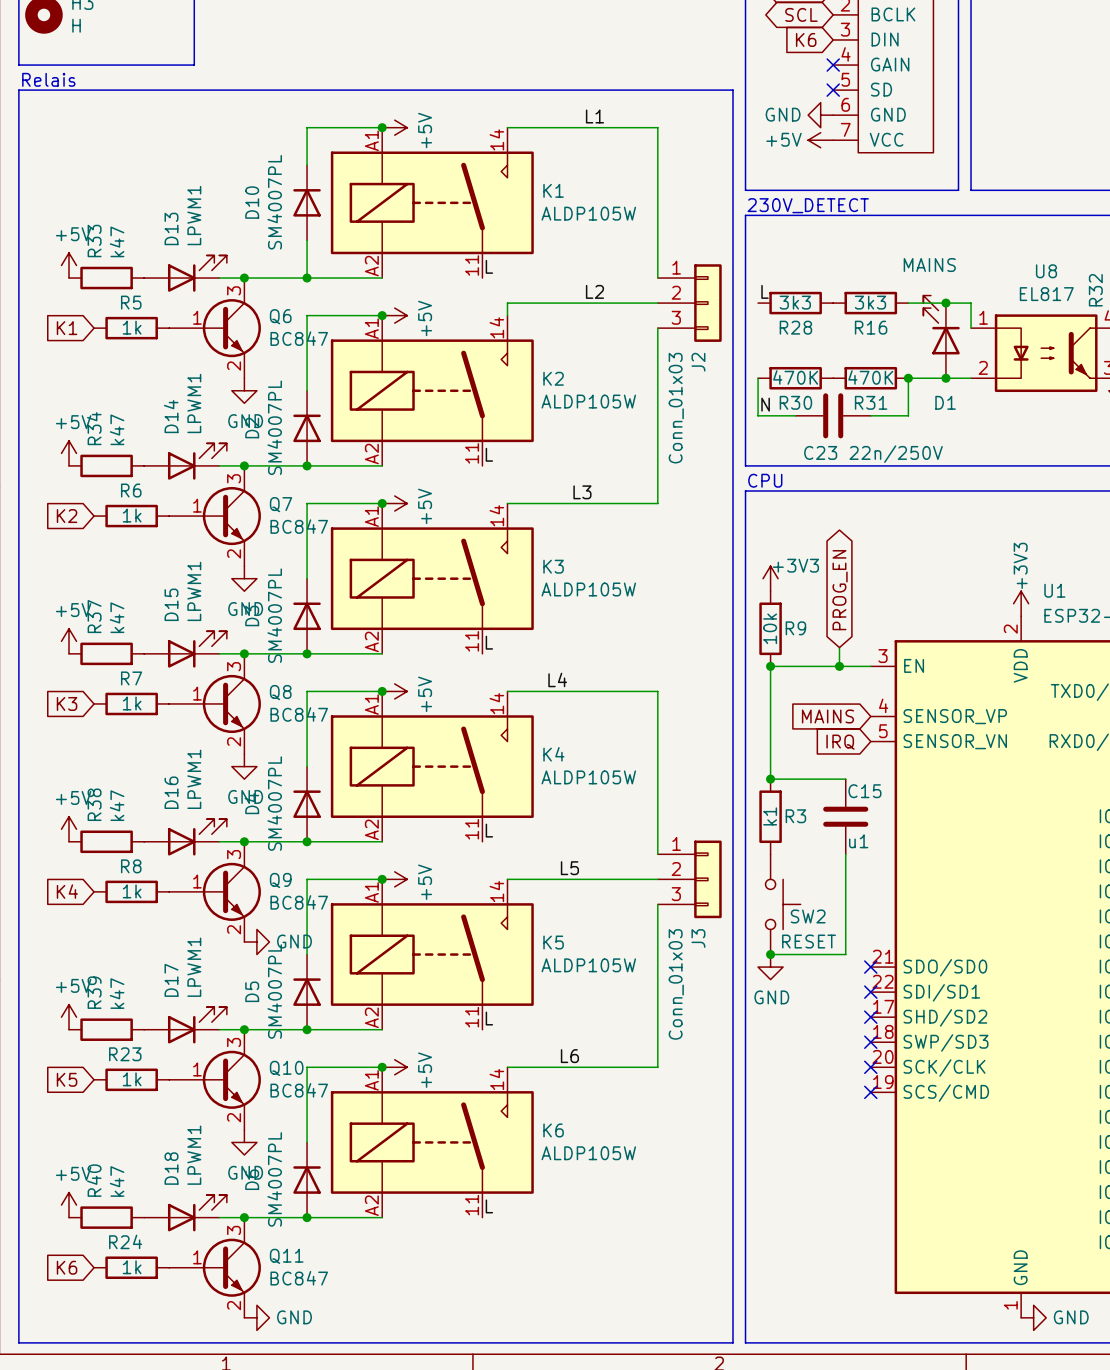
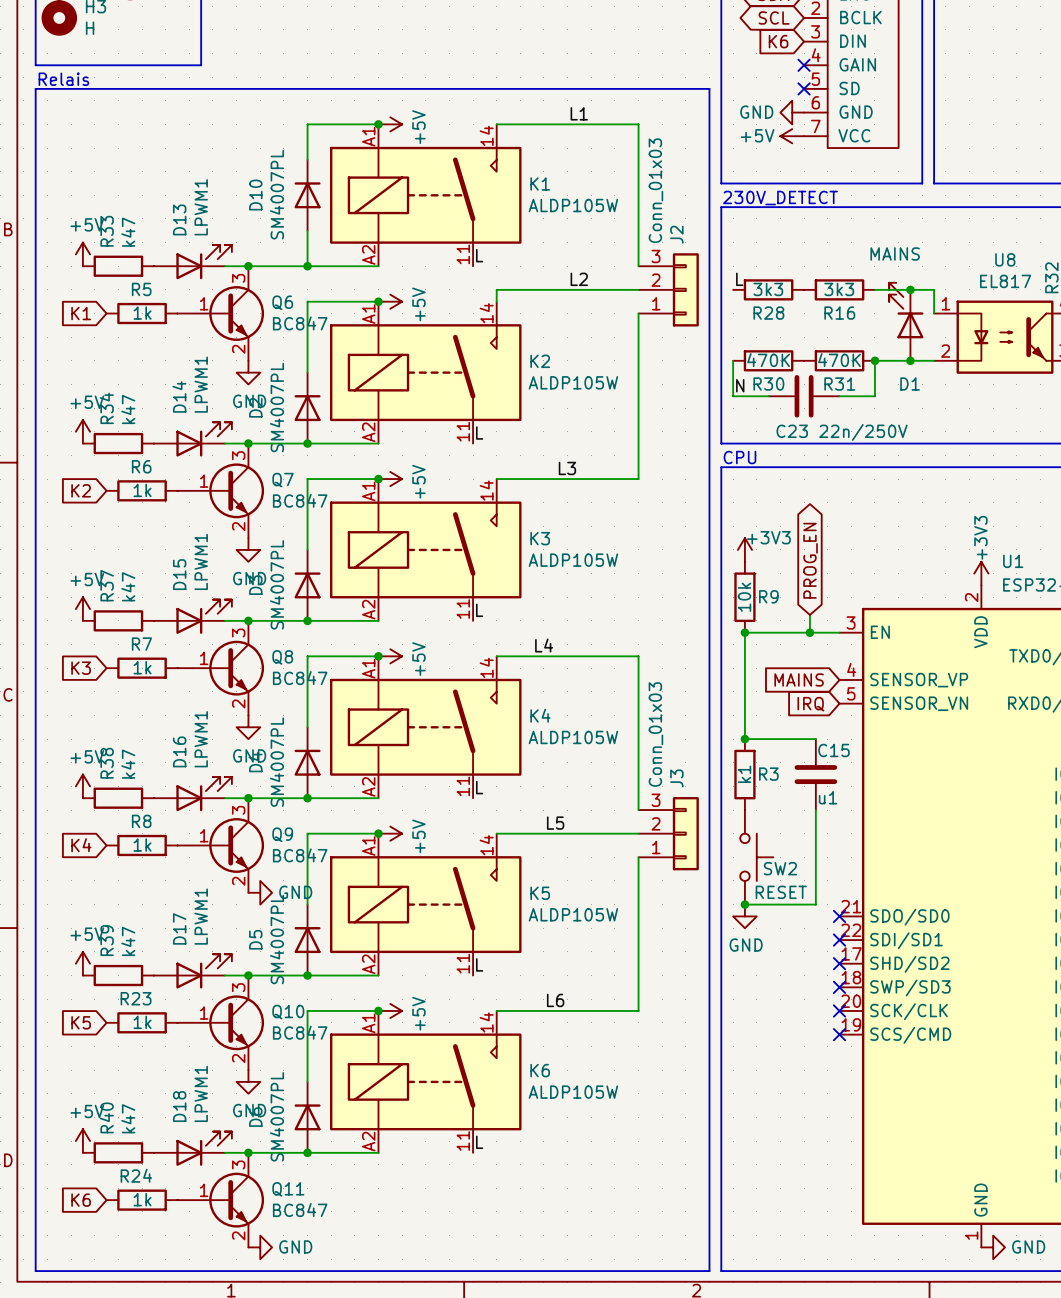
J2 flip: as is (707, 303) -> up-down (685, 289)
J3 flip: as is (707, 879) -> up-down (685, 833)

